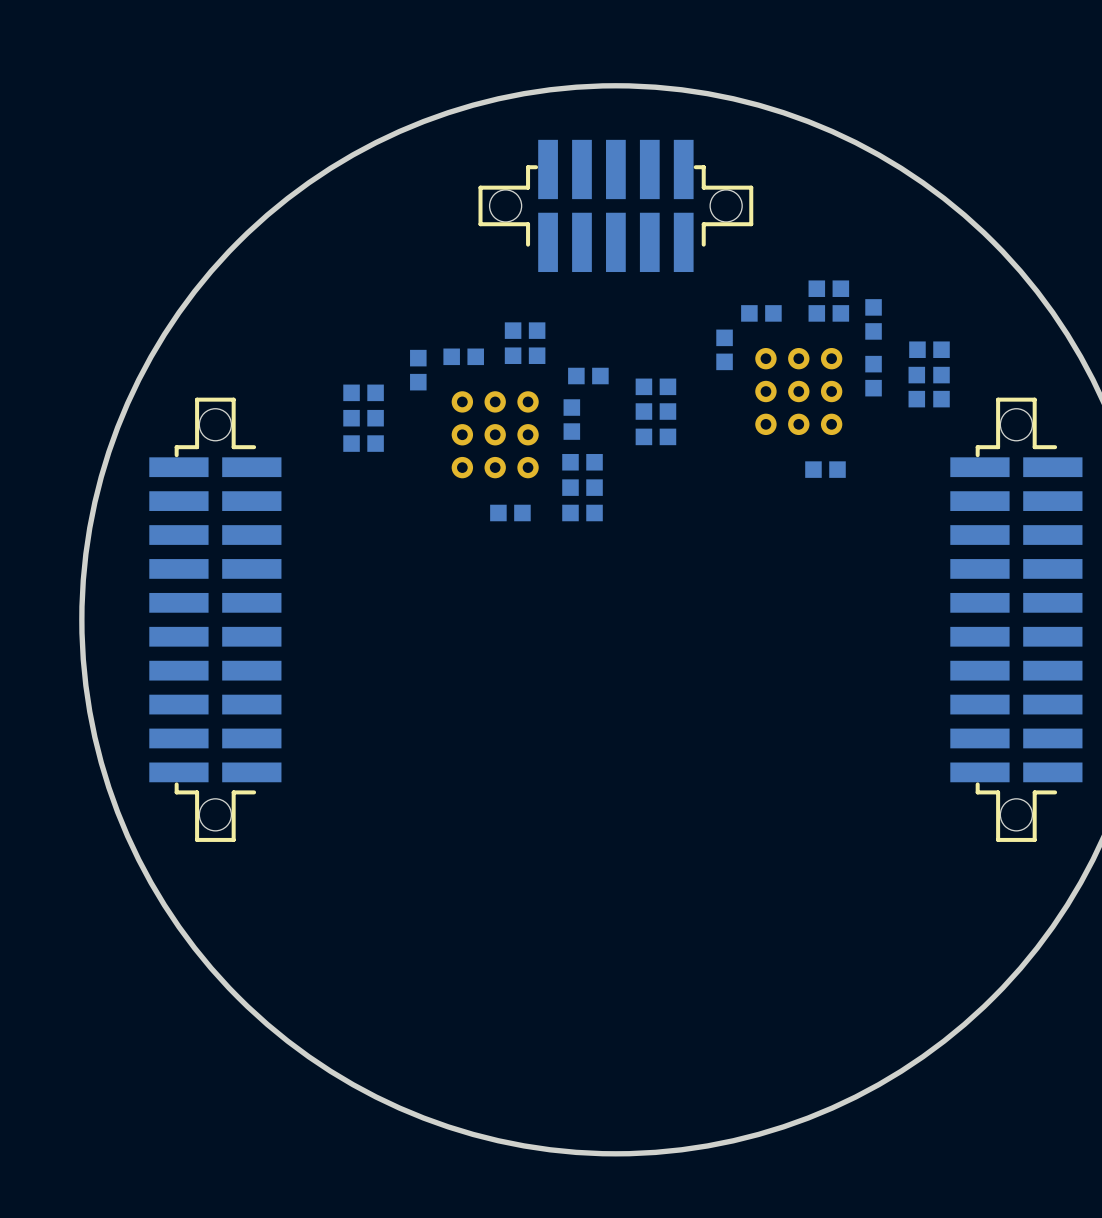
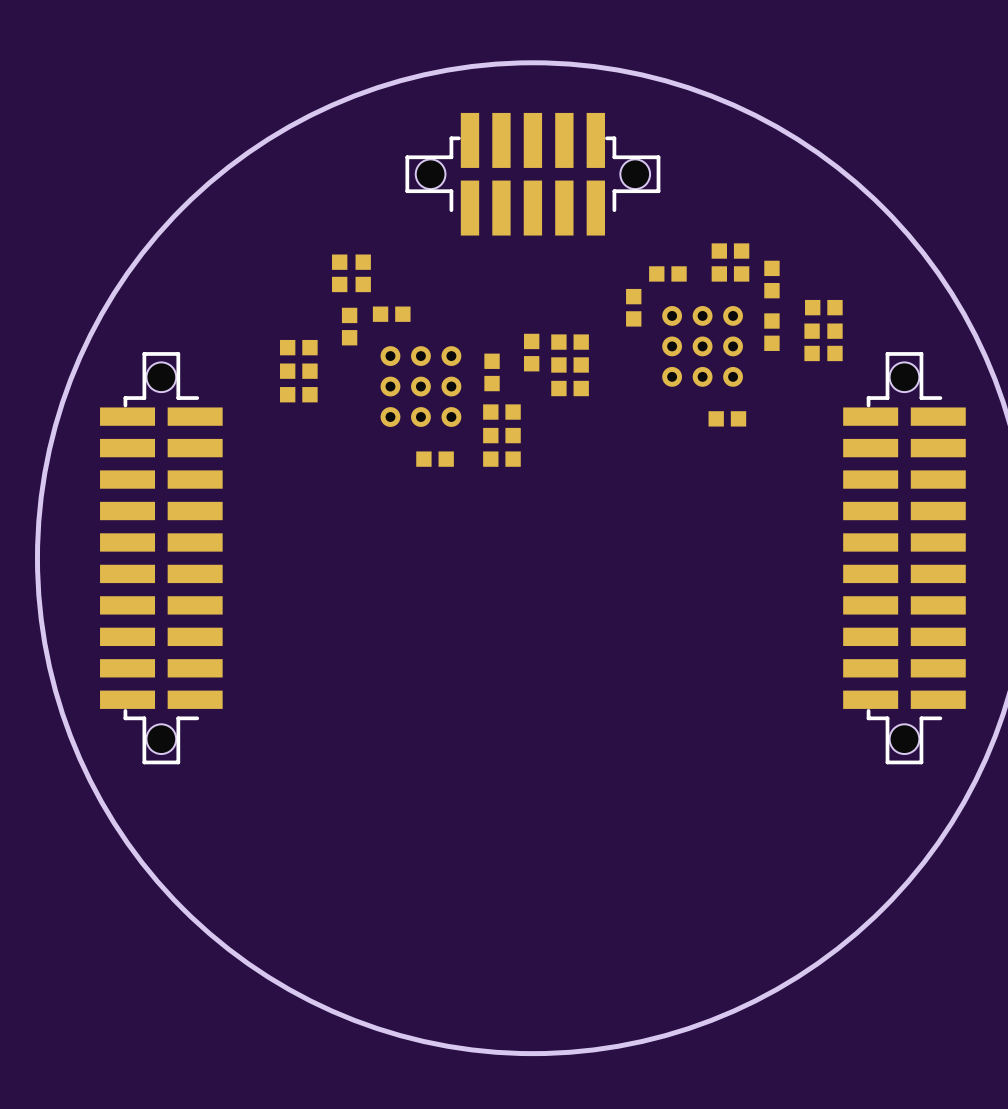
part: none -> (339, 273)
part: none -> (363, 273)
part: (525, 330) -> none
part: (525, 355) -> none
part rotation: 0° (588, 376) -> 90° clockwise (531, 352)
part position: (588, 376) -> (531, 352)

